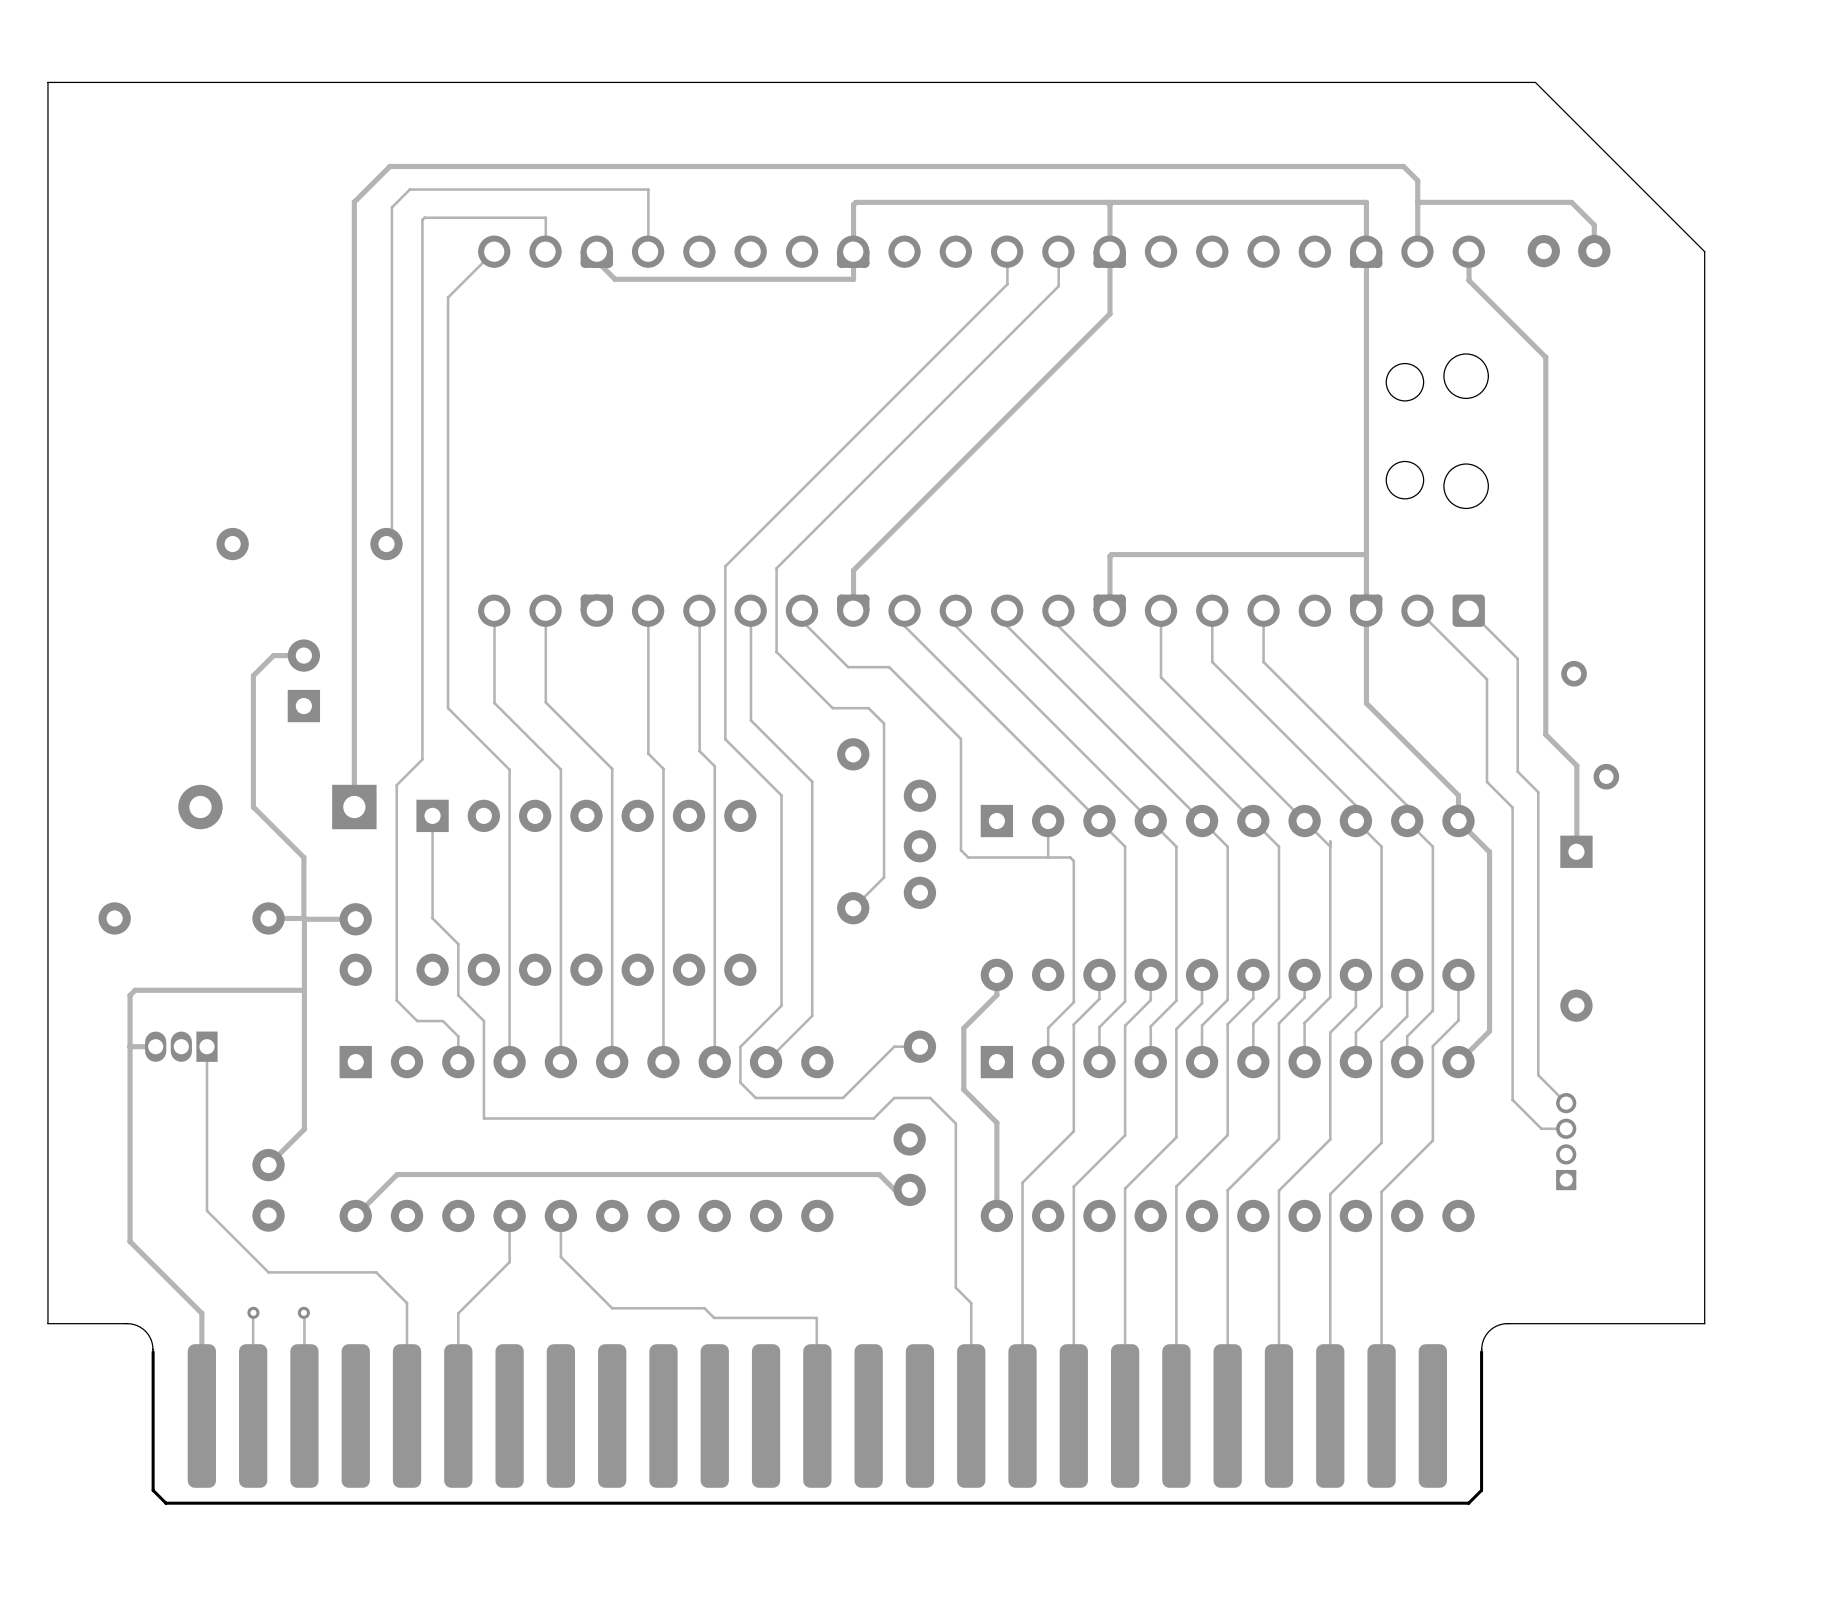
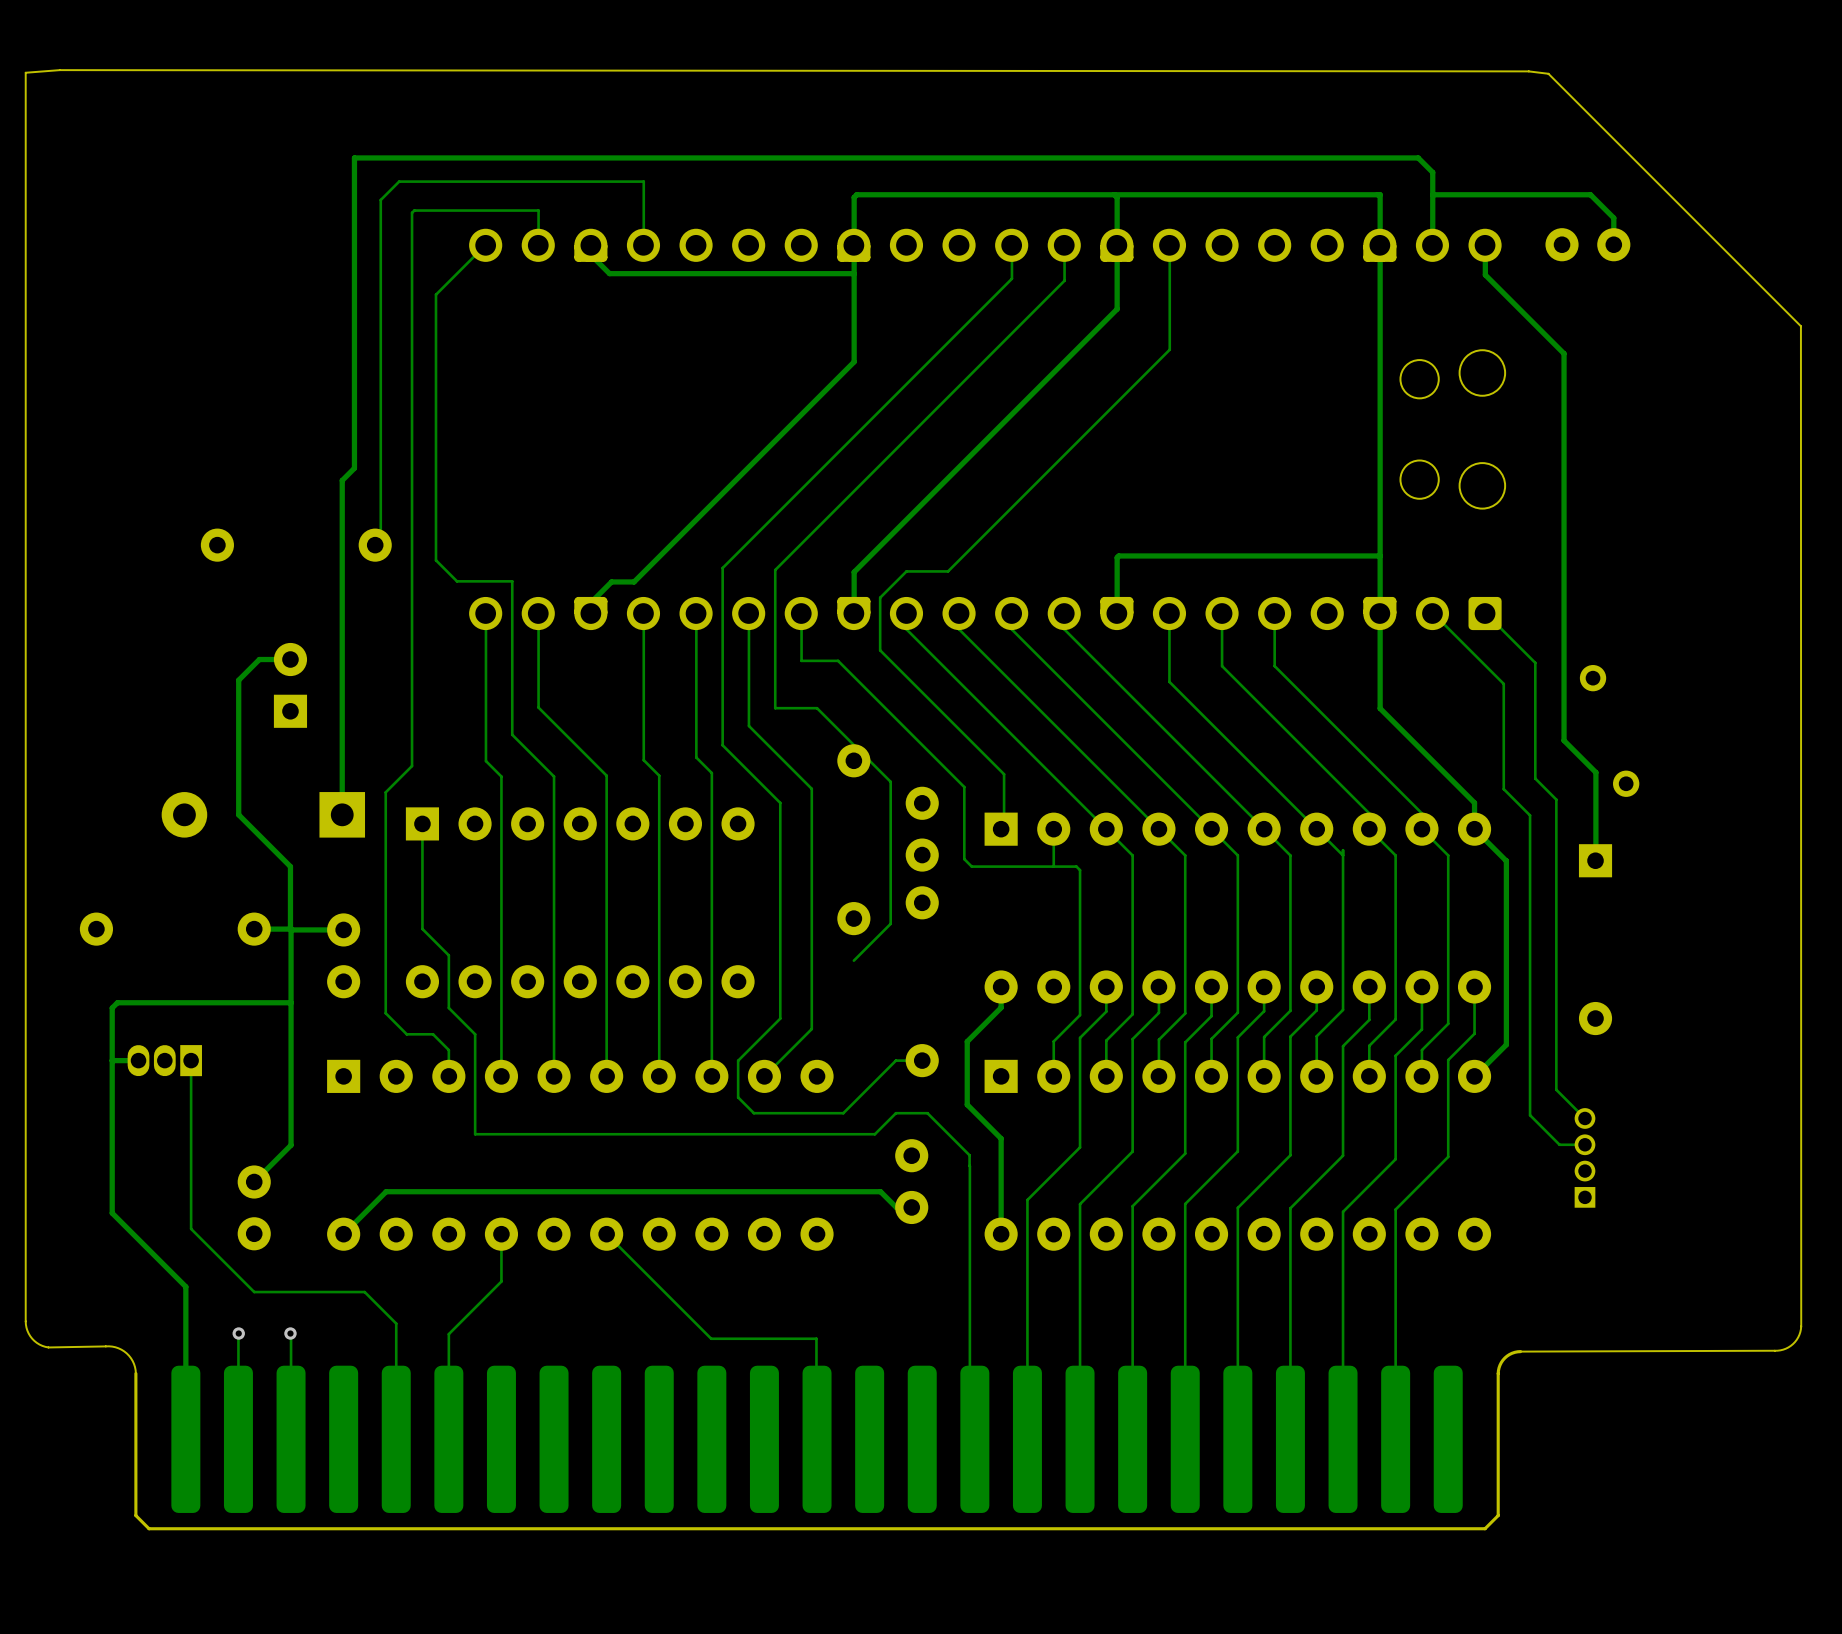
track: (389, 166) (354, 202) (354, 481) -> (378, 157) (354, 157) (354, 468) (342, 480)
track: none -> (1169, 244) (1169, 349) (948, 571) (906, 571) (880, 597) (880, 650) (1004, 774) (1004, 825)
track: none -> (854, 273) (854, 361) (634, 581) (611, 581) (591, 602)
track: (448, 297) (448, 708) (494, 754) -> (438, 292) (435, 294) (435, 560) (457, 581) (512, 581) (512, 734) (554, 776)
track: (801, 610) (801, 620) (837, 656) -> (801, 612) (801, 660) (838, 660)
track: (776, 652) (832, 708) (868, 708) (884, 723) (884, 877) (853, 908) -> (775, 655) (775, 708) (817, 708) (890, 781) (890, 923) (853, 960)
track: (848, 667) (889, 667) (960, 738) (960, 779) -> (848, 671) (964, 787)
track: (494, 703) (560, 769) -> (485, 708) (485, 761)
track: (925, 1097) (930, 1097) (955, 1123) (955, 1287) (971, 1303) (971, 1415) -> (927, 1113) (969, 1155) (969, 1165)
track: none -> (969, 1166) (969, 1434)
track: (130, 1195) (130, 1241) (201, 1313) -> (112, 1213) (185, 1286) (185, 1334)
track: (560, 1215) (560, 1256) (612, 1308) (704, 1308) -> (606, 1234) (701, 1328)
board edge: (1481, 1351) (1483, 1340) (1487, 1333) (1493, 1327) (1504, 1323) (1704, 1323) (1704, 251) (1535, 82) (47, 82) (47, 1323) (133, 1324) (147, 1333) (152, 1342) (153, 1351) -> (1498, 1373) (1502, 1360) (1509, 1354) (1517, 1351) (1780, 1350) (1795, 1342) (1801, 1326) (1800, 326) (1548, 73) (1528, 71) (59, 70) (25, 72) (25, 1321) (27, 1330) (32, 1338) (45, 1346) (109, 1346) (121, 1349) (132, 1361) (135, 1373)

